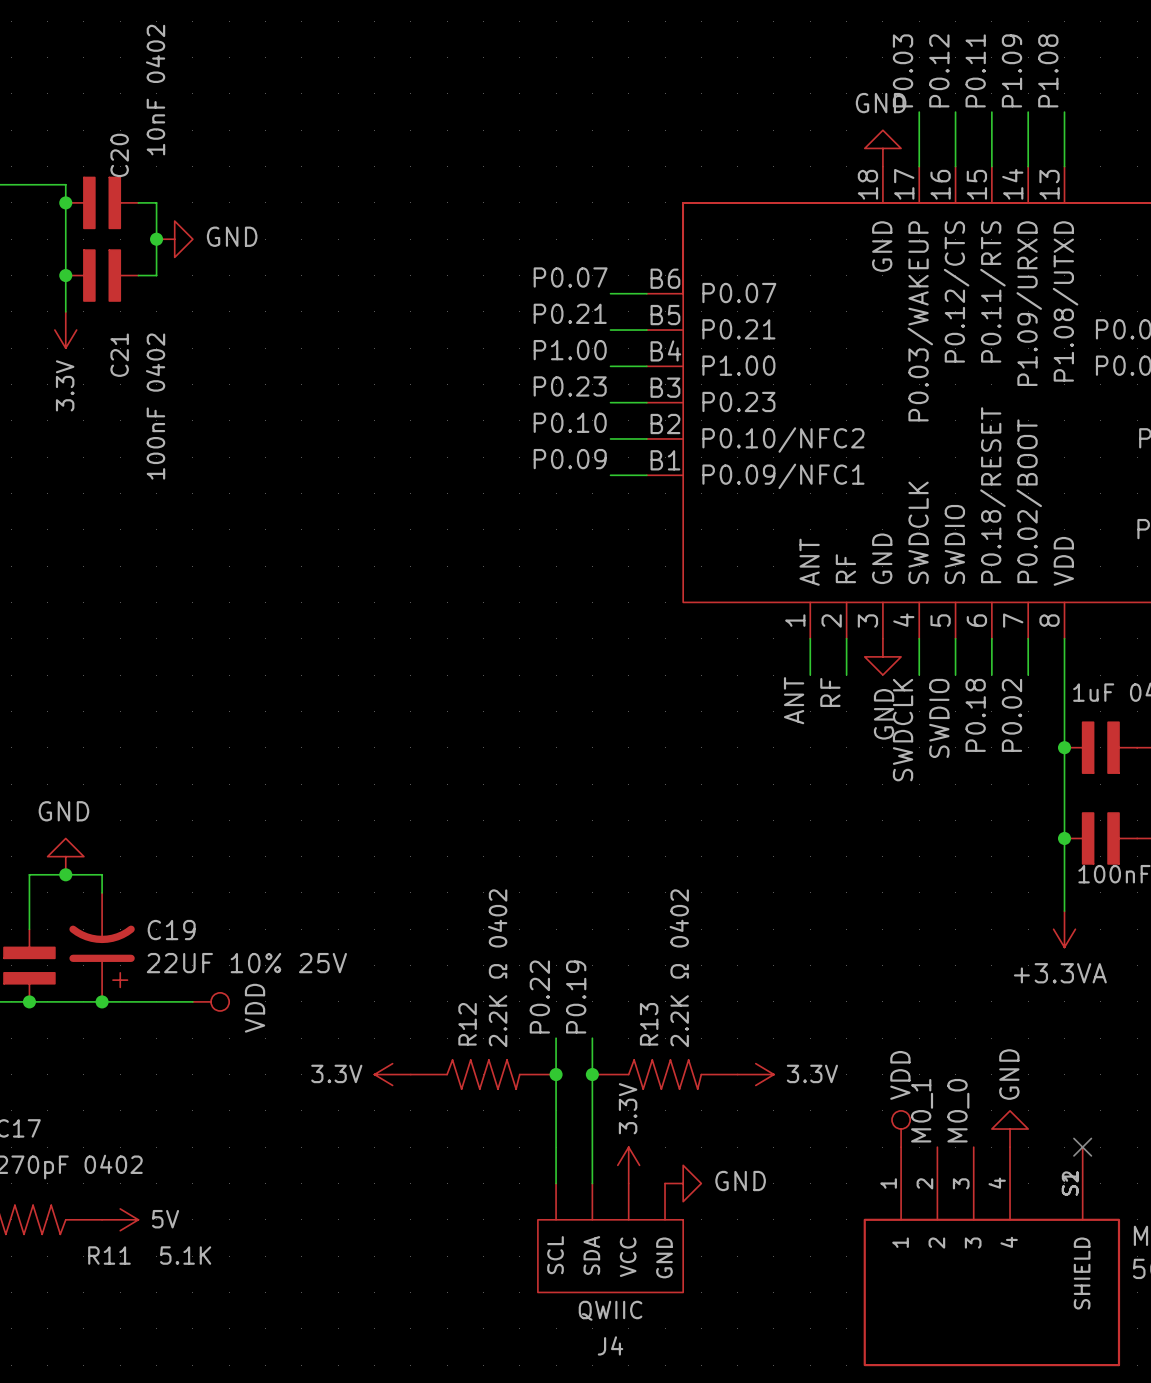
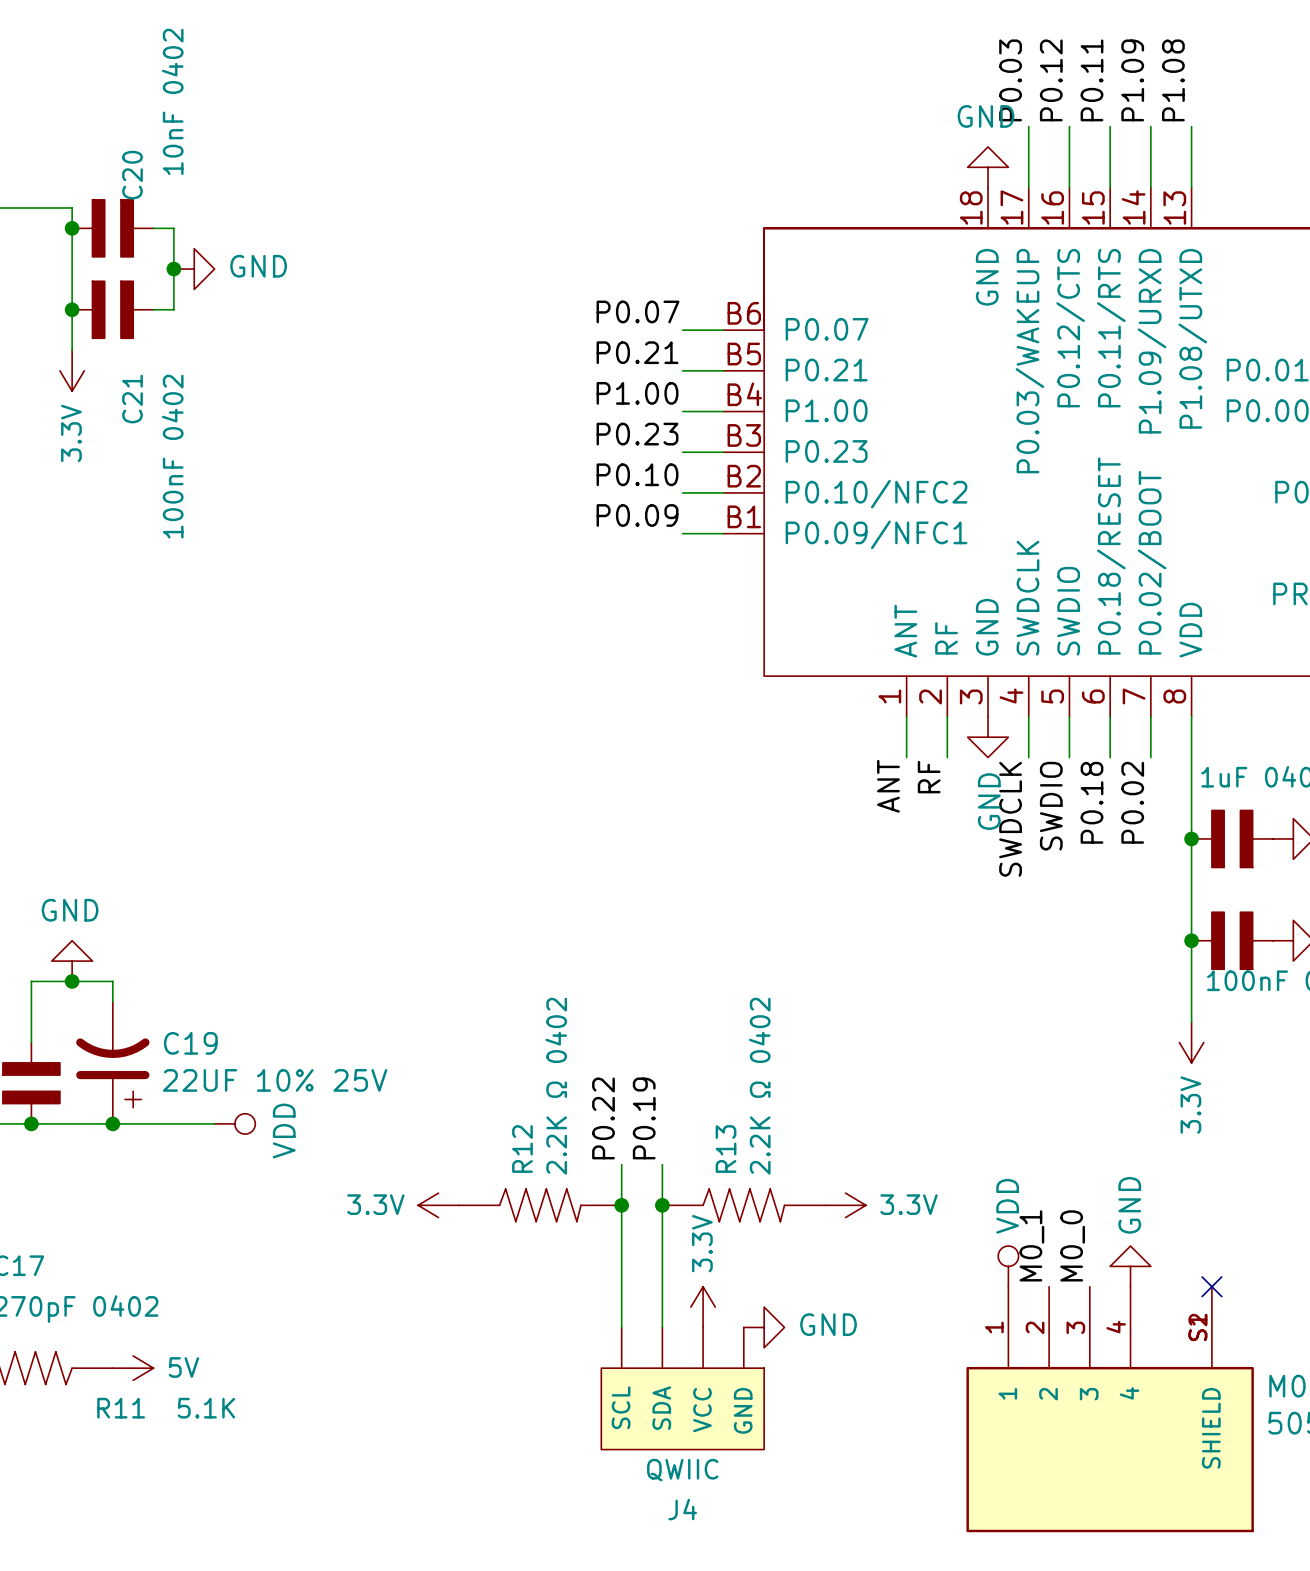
power symbol: +3.3VA (1064, 929) -> 3.3V (1191, 1042)

